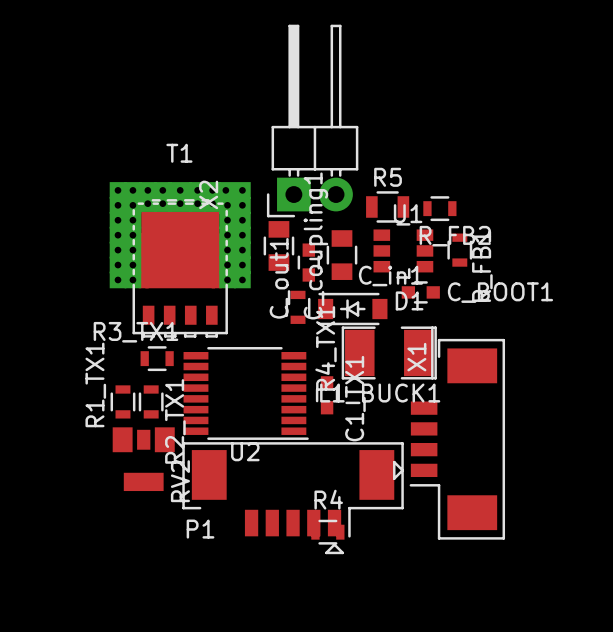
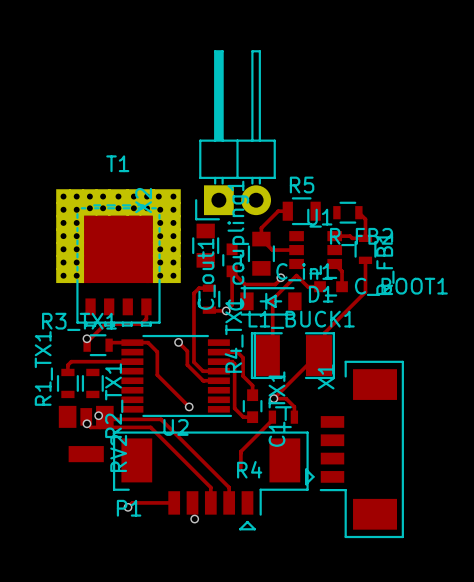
track: none -> (287, 211) (278, 211) (261, 228) (261, 239) (272, 250) (296, 250)
track: none -> (358, 212) (365, 219) (365, 238) (334, 236)
track: none -> (365, 260) (365, 292) (324, 332) (324, 347) (273, 398) (286, 398) (294, 406) (294, 417)
track: none -> (334, 263) (342, 271) (342, 286)
track: none -> (232, 271) (232, 305) (226, 310) (209, 310)
track: none -> (232, 271) (244, 284) (275, 284) (280, 277)
via: none -> (280, 277)
track: none -> (320, 286) (307, 286) (296, 275) (270, 301) (272, 303) (272, 340)
track: none -> (209, 288) (199, 288) (193, 293) (193, 362) (202, 371) (218, 371)
R4_TX1 position: (298, 307) -> (209, 299)
track: none -> (146, 306) (146, 318) (141, 324) (105, 324) (87, 342) (87, 345)
via: none -> (226, 310)
via: none -> (86, 338)
L1_BUCK1 rotation: 0° (389, 352) -> 180° (292, 355)
track: none -> (178, 342) (187, 351) (187, 364) (203, 380) (218, 380)
via: none -> (178, 342)
track: none -> (109, 345) (111, 342) (148, 342) (157, 351) (157, 375) (189, 406)
track: none -> (218, 352) (237, 352) (243, 357) (243, 376) (252, 385) (252, 395)
track: none -> (132, 361) (71, 361) (67, 365) (67, 372)
track: none -> (218, 361) (232, 361) (234, 364) (234, 408) (243, 417) (252, 417)
C1_TX1 position: (327, 395) -> (252, 406)
via: none -> (273, 398)
via: none -> (189, 406)
track: none -> (98, 415) (102, 419) (160, 419) (229, 487) (229, 502)
via: none -> (98, 415)
X1 position: (449, 439) -> (354, 449)
track: none -> (272, 417) (272, 420) (240, 451) (240, 467)
track: none -> (86, 423) (90, 427) (150, 427) (210, 487) (210, 502)
via: none -> (86, 423)
P1 position: (293, 498) -> (210, 480)
R4 position: (327, 532) -> (283, 417)
track: none -> (174, 502) (132, 502) (128, 507)
via: none -> (128, 507)
via: none -> (194, 519)

